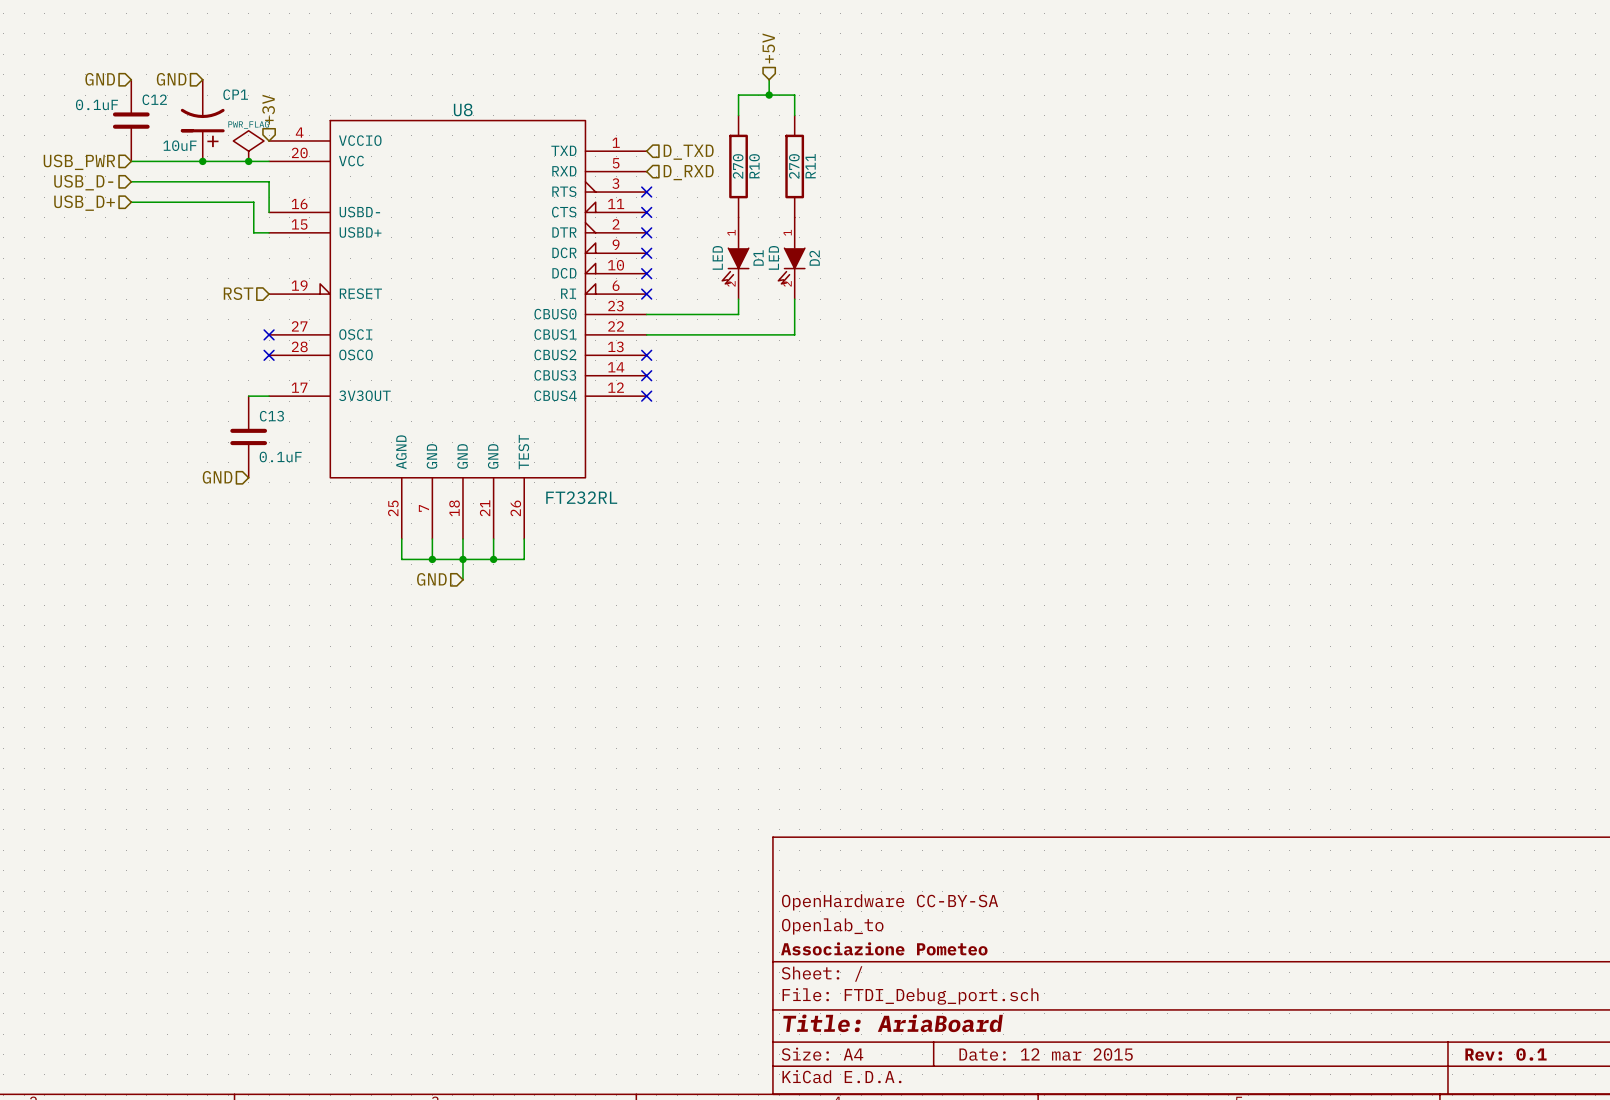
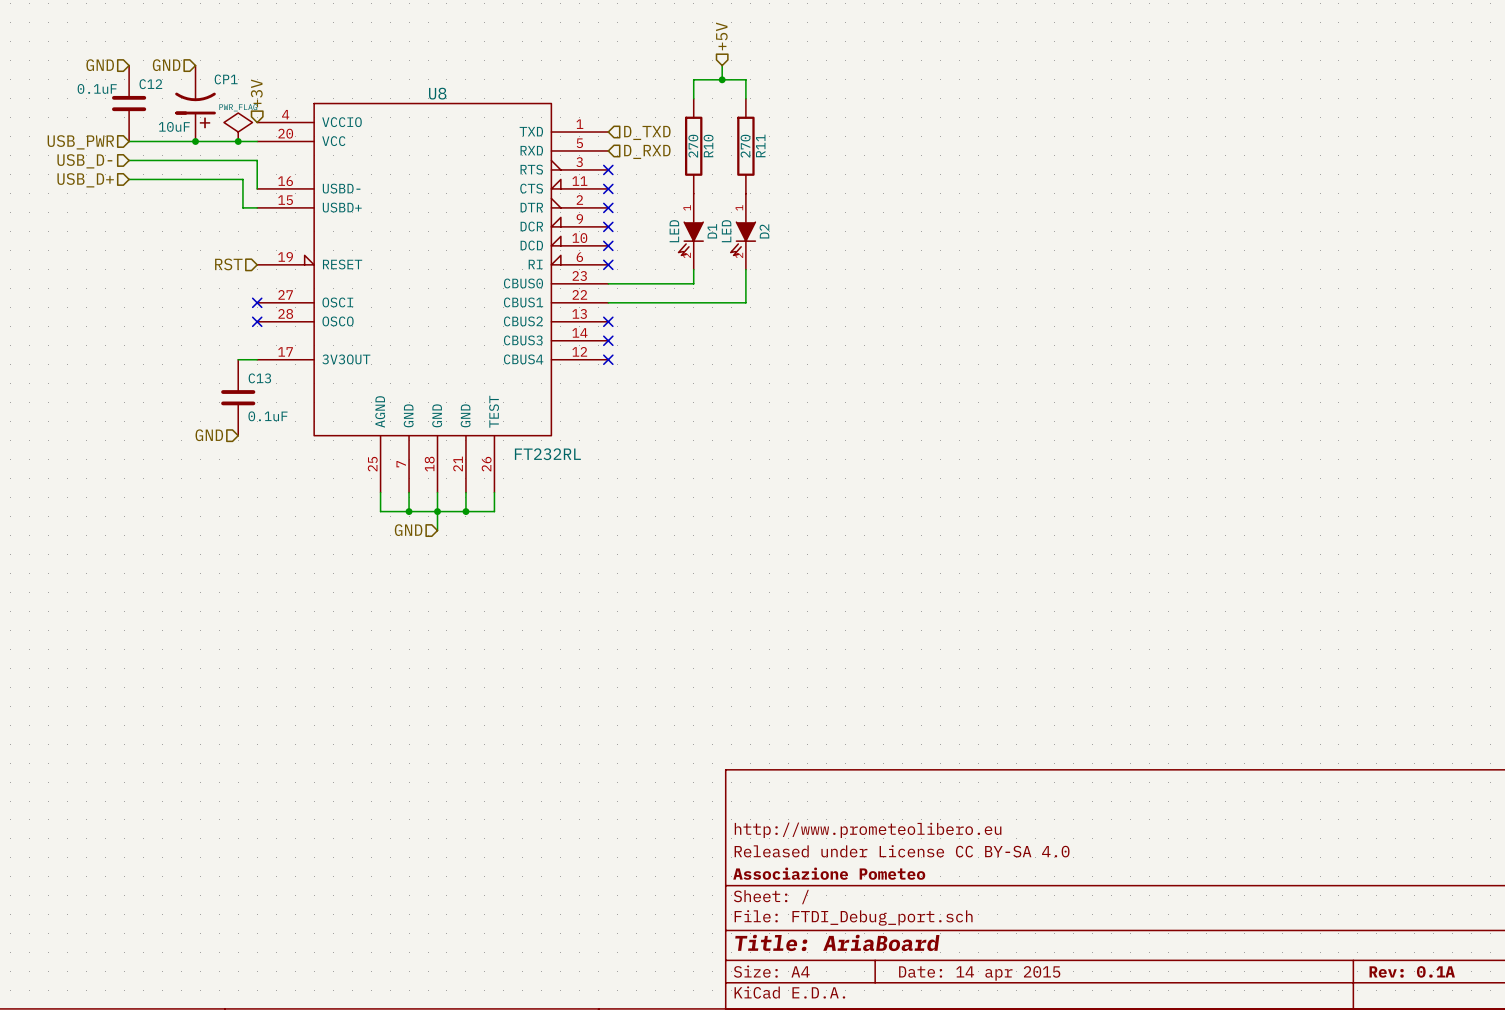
title block: OpenHardware CC-BY-SA (890, 902) -> http://www.prometeolibero.eu (868, 830)
title block: Openlab_to (832, 926) -> Released under License CC BY-SA 4.0 (902, 851)
title block: Date: 12 mar 2015 (1046, 1054) -> Date: 14 apr 2015 (979, 973)
title block: Rev: 0.1 (1505, 1054) -> Rev: 0.1A (1412, 971)

